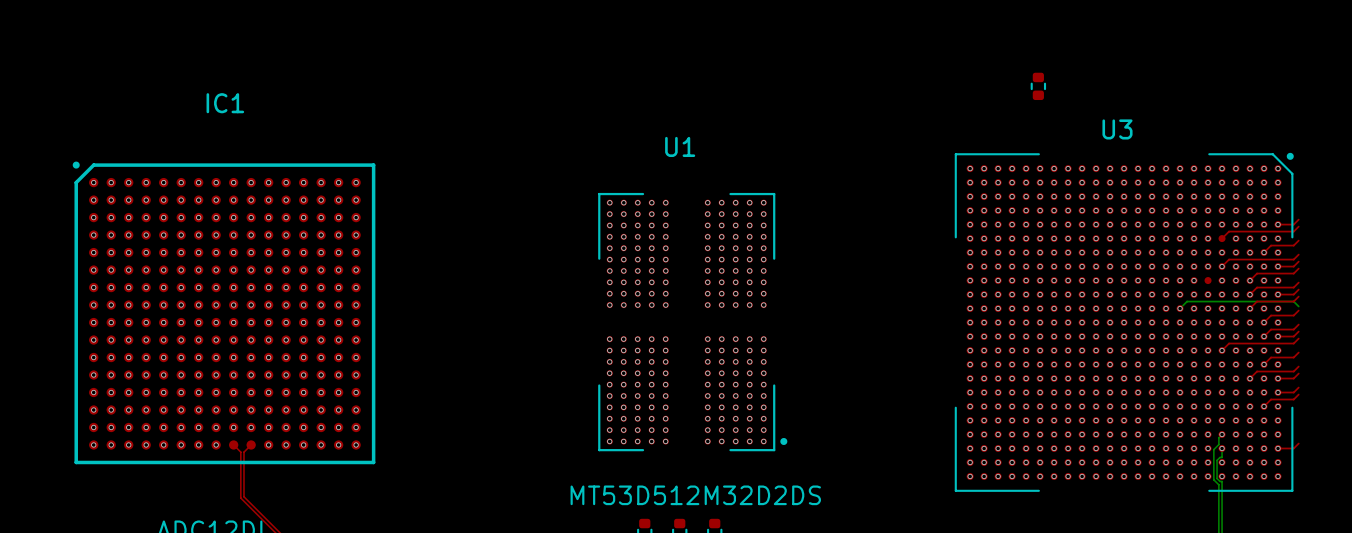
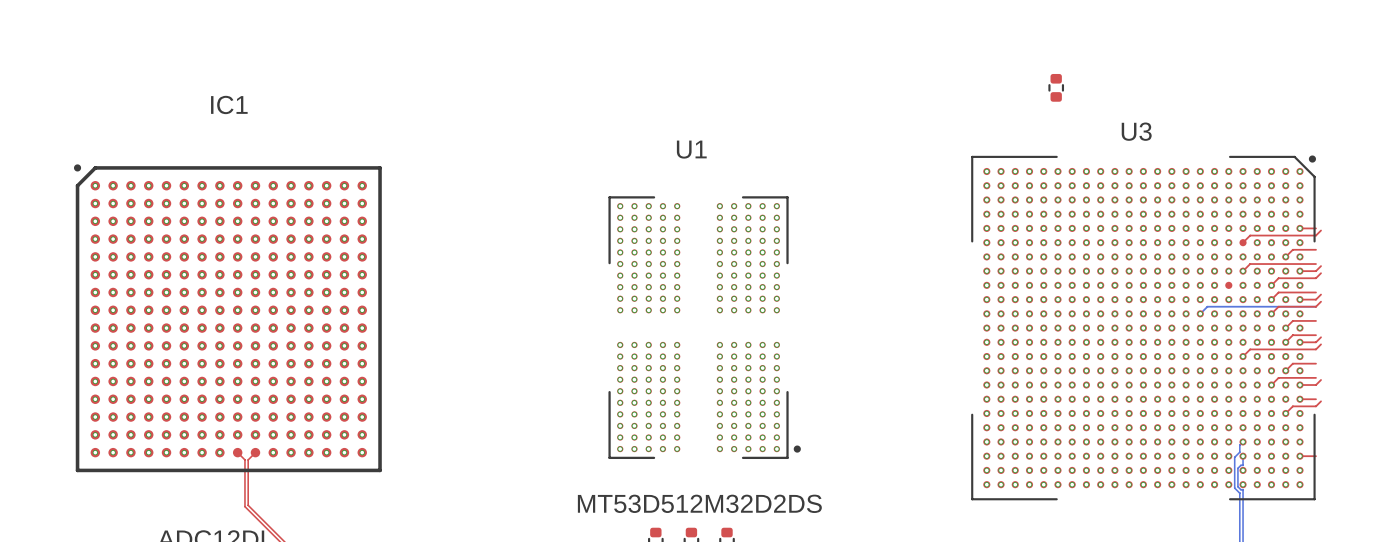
top track: (1298, 219) (1293, 224) -> none
top track: (1298, 240) (1293, 245) -> none
top track: (1298, 254) (1293, 259) -> none
top track: (1298, 282) (1293, 287) -> none
bottom track: (1293, 301) (1298, 306) -> none
top track: (1298, 310) (1293, 315) -> none
top track: (1298, 324) (1293, 329) -> none
top track: (1298, 352) (1293, 357) -> none
top track: (1298, 366) (1293, 371) -> none
top track: (1298, 387) (1293, 392) -> none
top track: (1298, 443) (1293, 448) -> none

